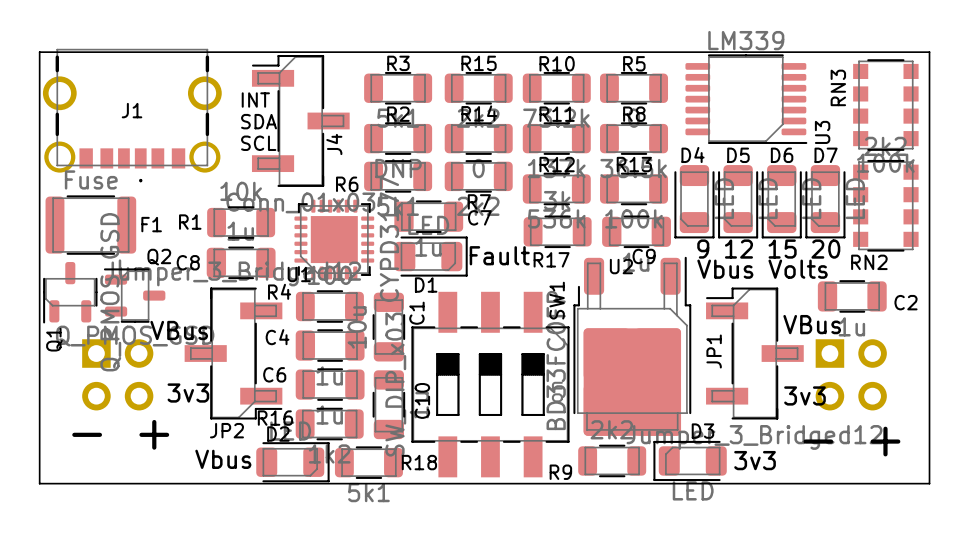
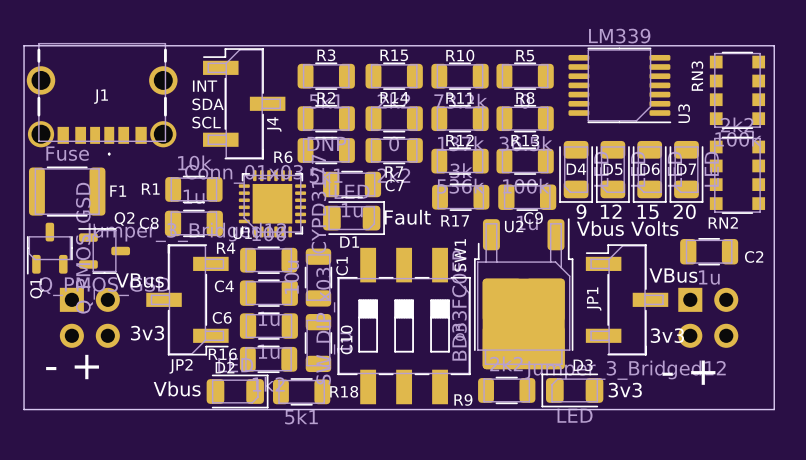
D4 name position: D4 (693, 155) -> D4 (576, 169)
D5 name position: D5 (738, 155) -> D5 (612, 169)
D6 name position: D6 (782, 155) -> D6 (649, 169)
D7 name position: D7 (826, 155) -> D7 (686, 169)

